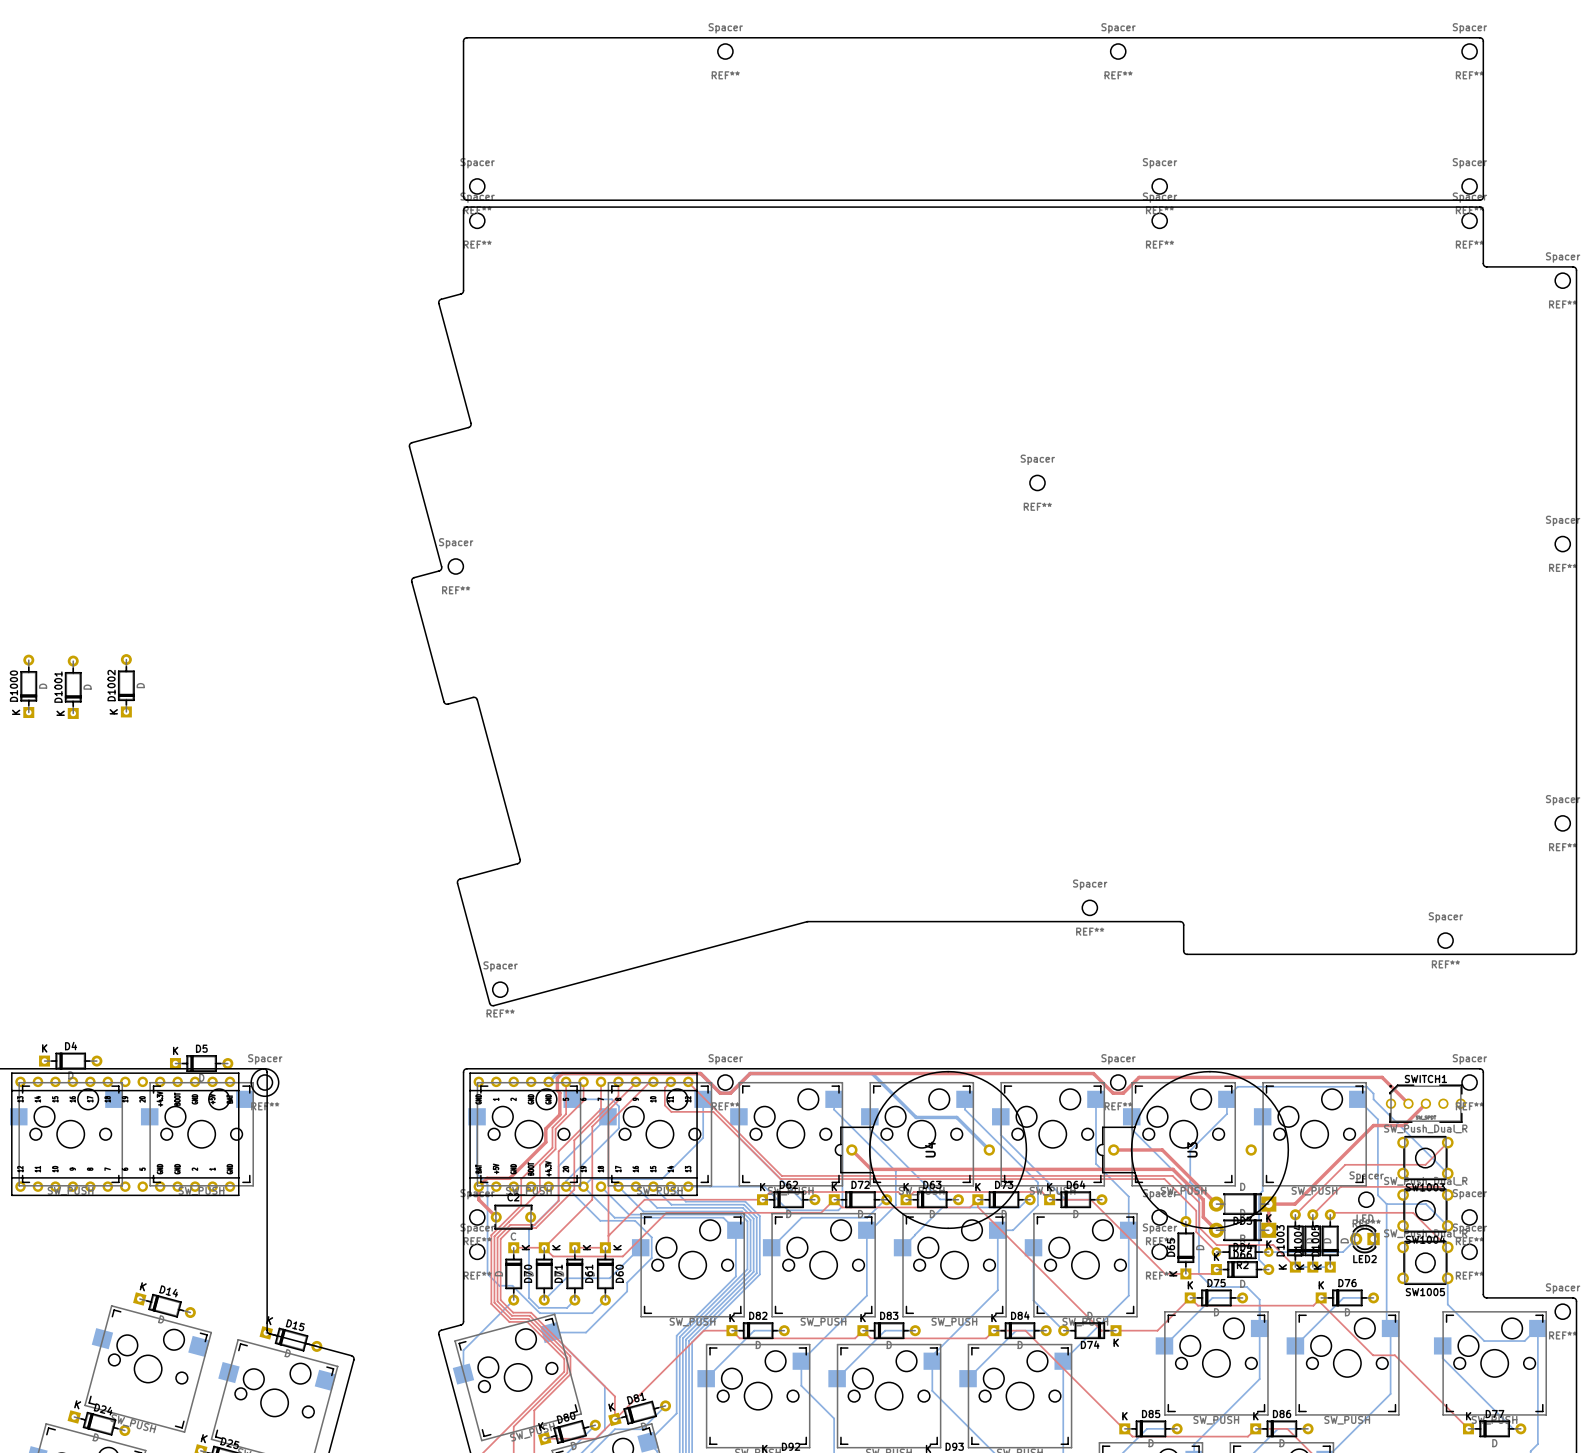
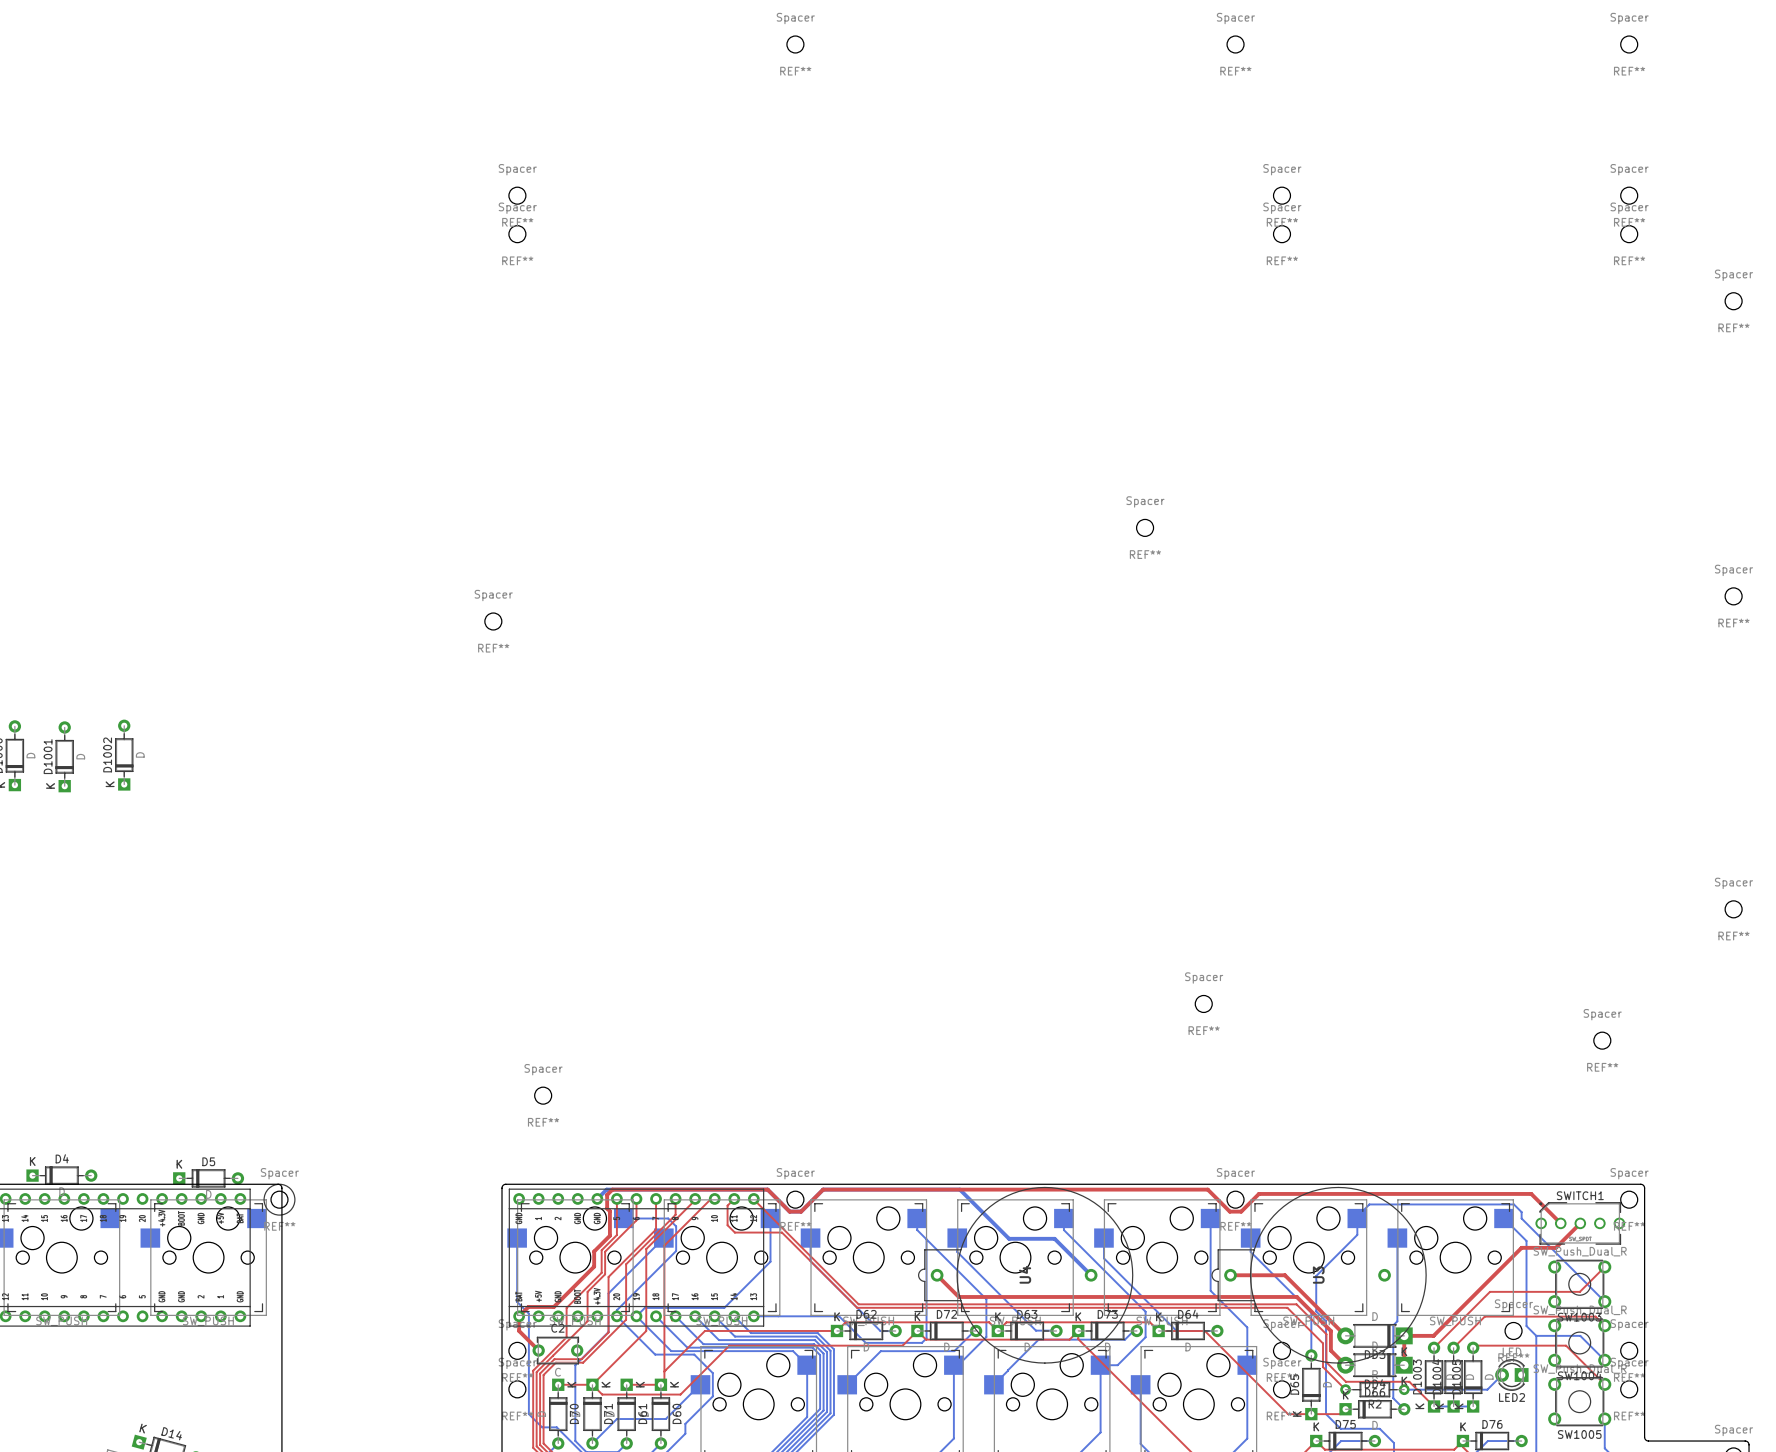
board edge: (466, 37) (1480, 37) (1483, 41) (1483, 197) (1479, 200) (466, 200) (463, 196) (463, 41) (466, 37) -> none
board edge: (466, 207) (1479, 207) (1483, 210) (1483, 263) (1485, 266) (1575, 267) (1575, 953) (1187, 954) (1183, 951) (1183, 924) (1180, 921) (807, 921) (490, 1005) (457, 881) (459, 879) (518, 863) (520, 859) (477, 699) (473, 697) (447, 704) (444, 702) (411, 580) (413, 577) (439, 570) (441, 567) (409, 444) (468, 427) (471, 424) (438, 302) (440, 299) (463, 291) (463, 210) (466, 207) -> none

